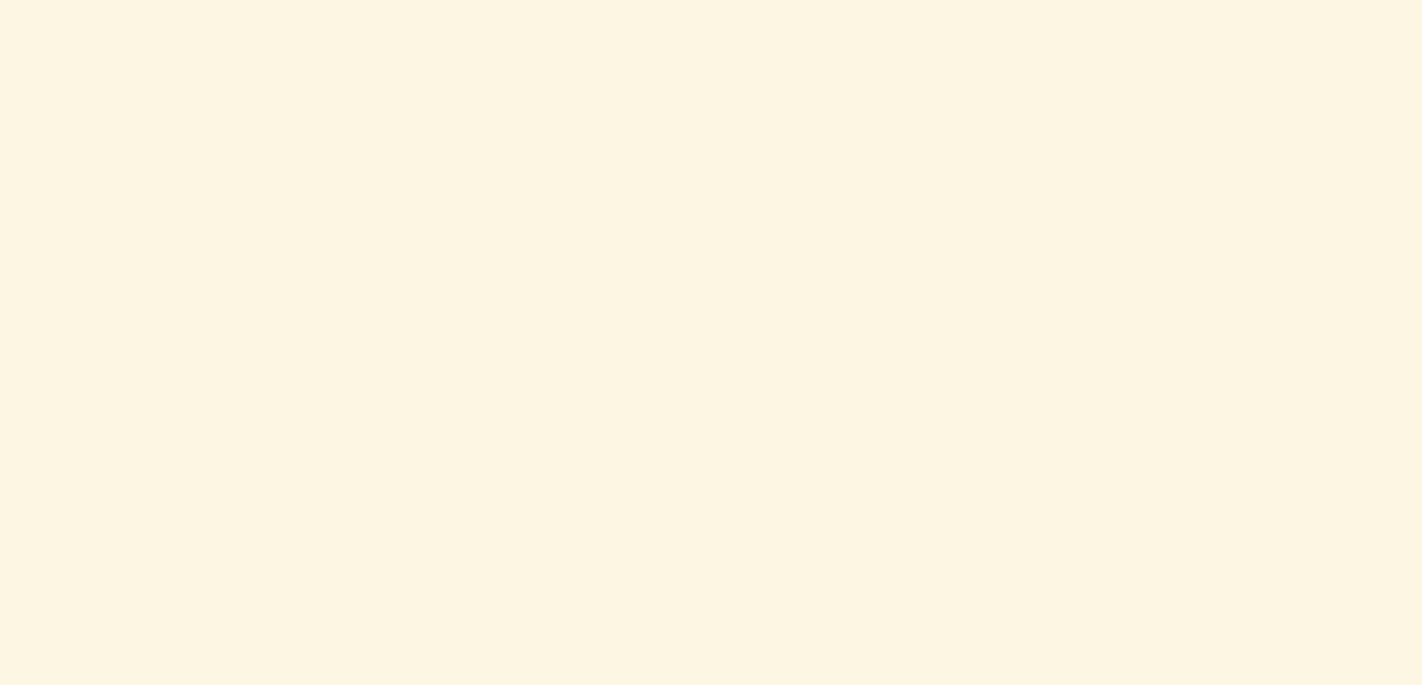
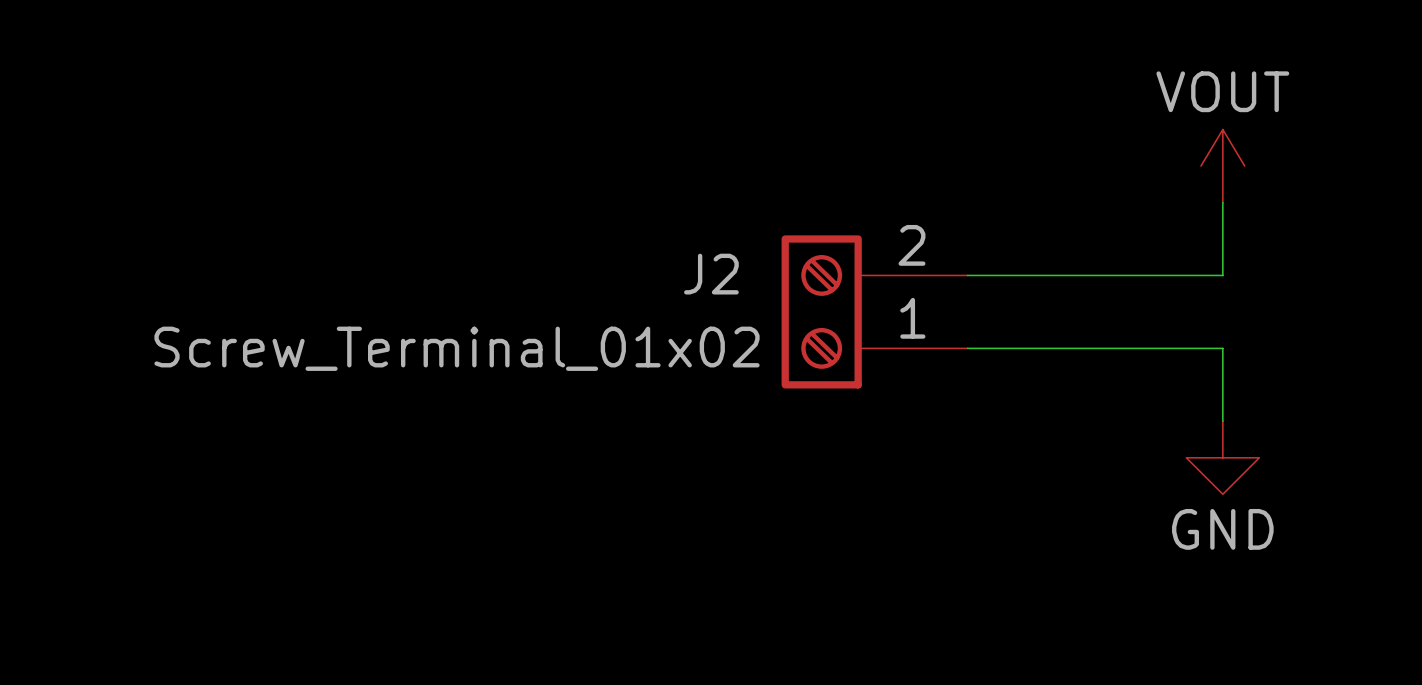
power symbol: none -> VOUT (1222, 166)
wire: none -> (1222, 202) (1222, 275) (967, 275)
J2: none -> Screw_Terminal_01x02 (874, 311)
wire: none -> (967, 348) (1222, 348) (1222, 421)
power symbol: none -> GND (1222, 457)

